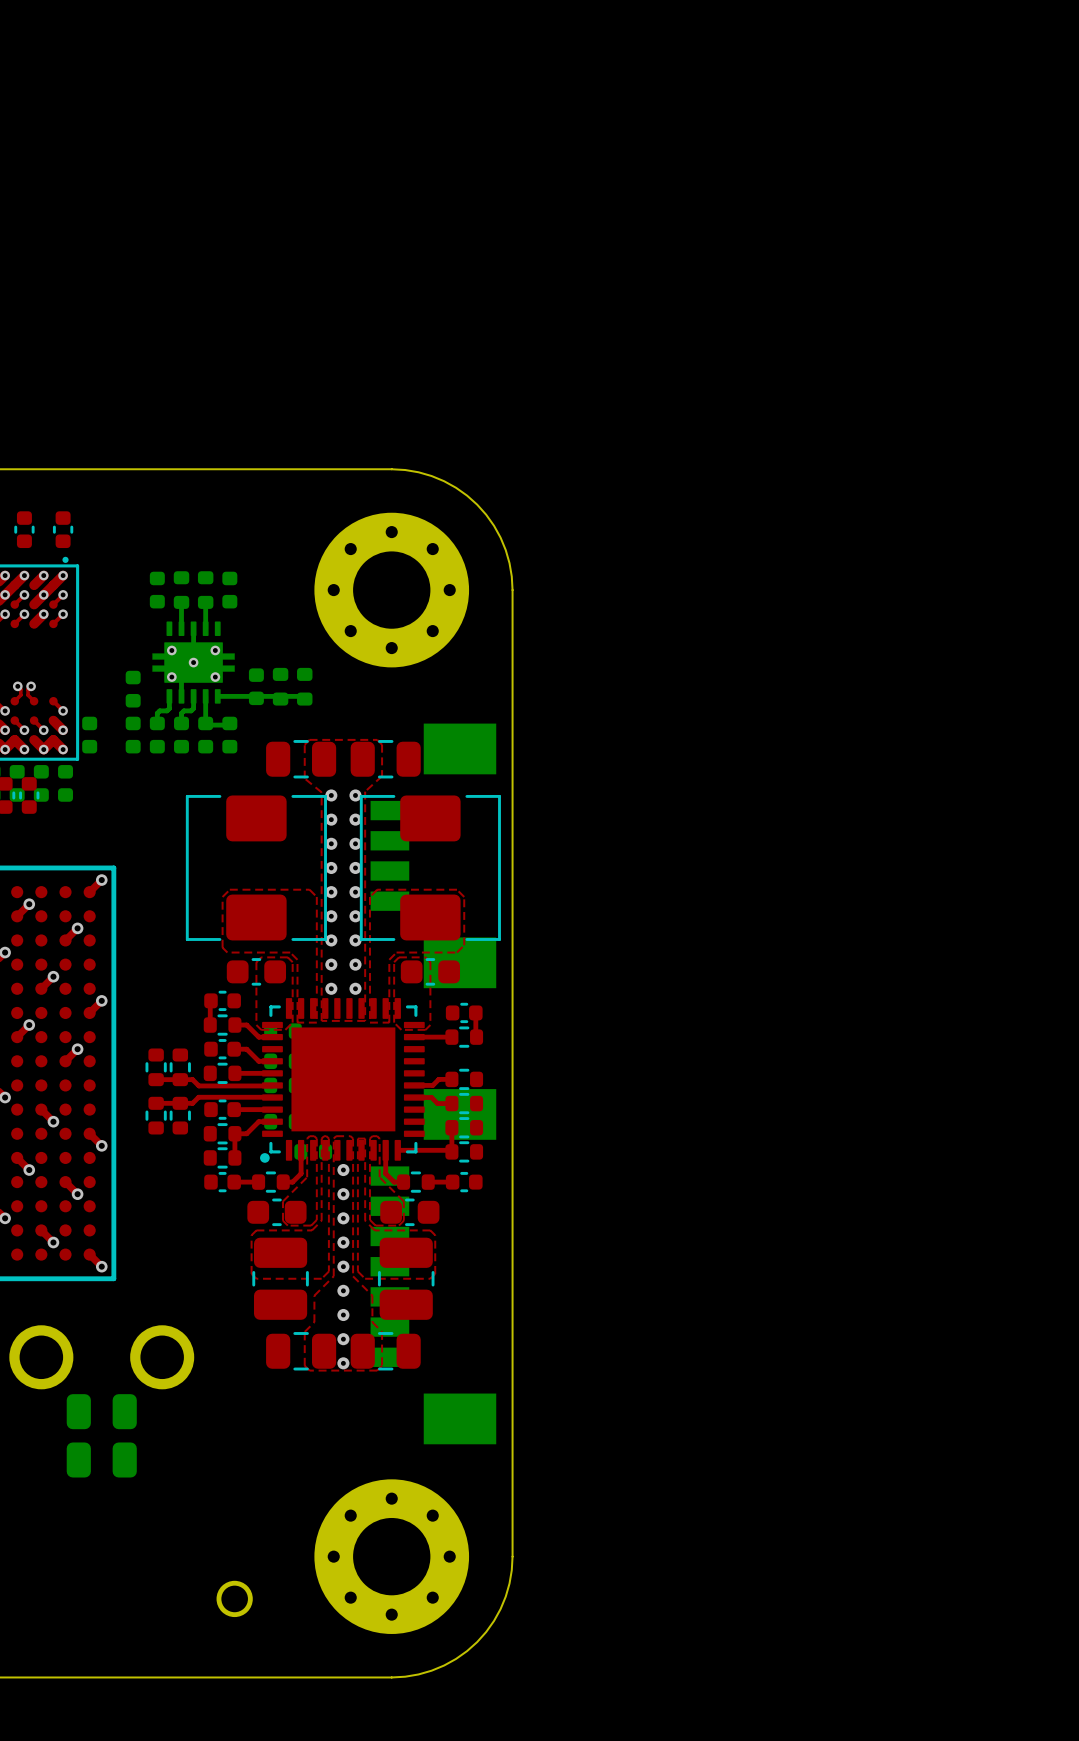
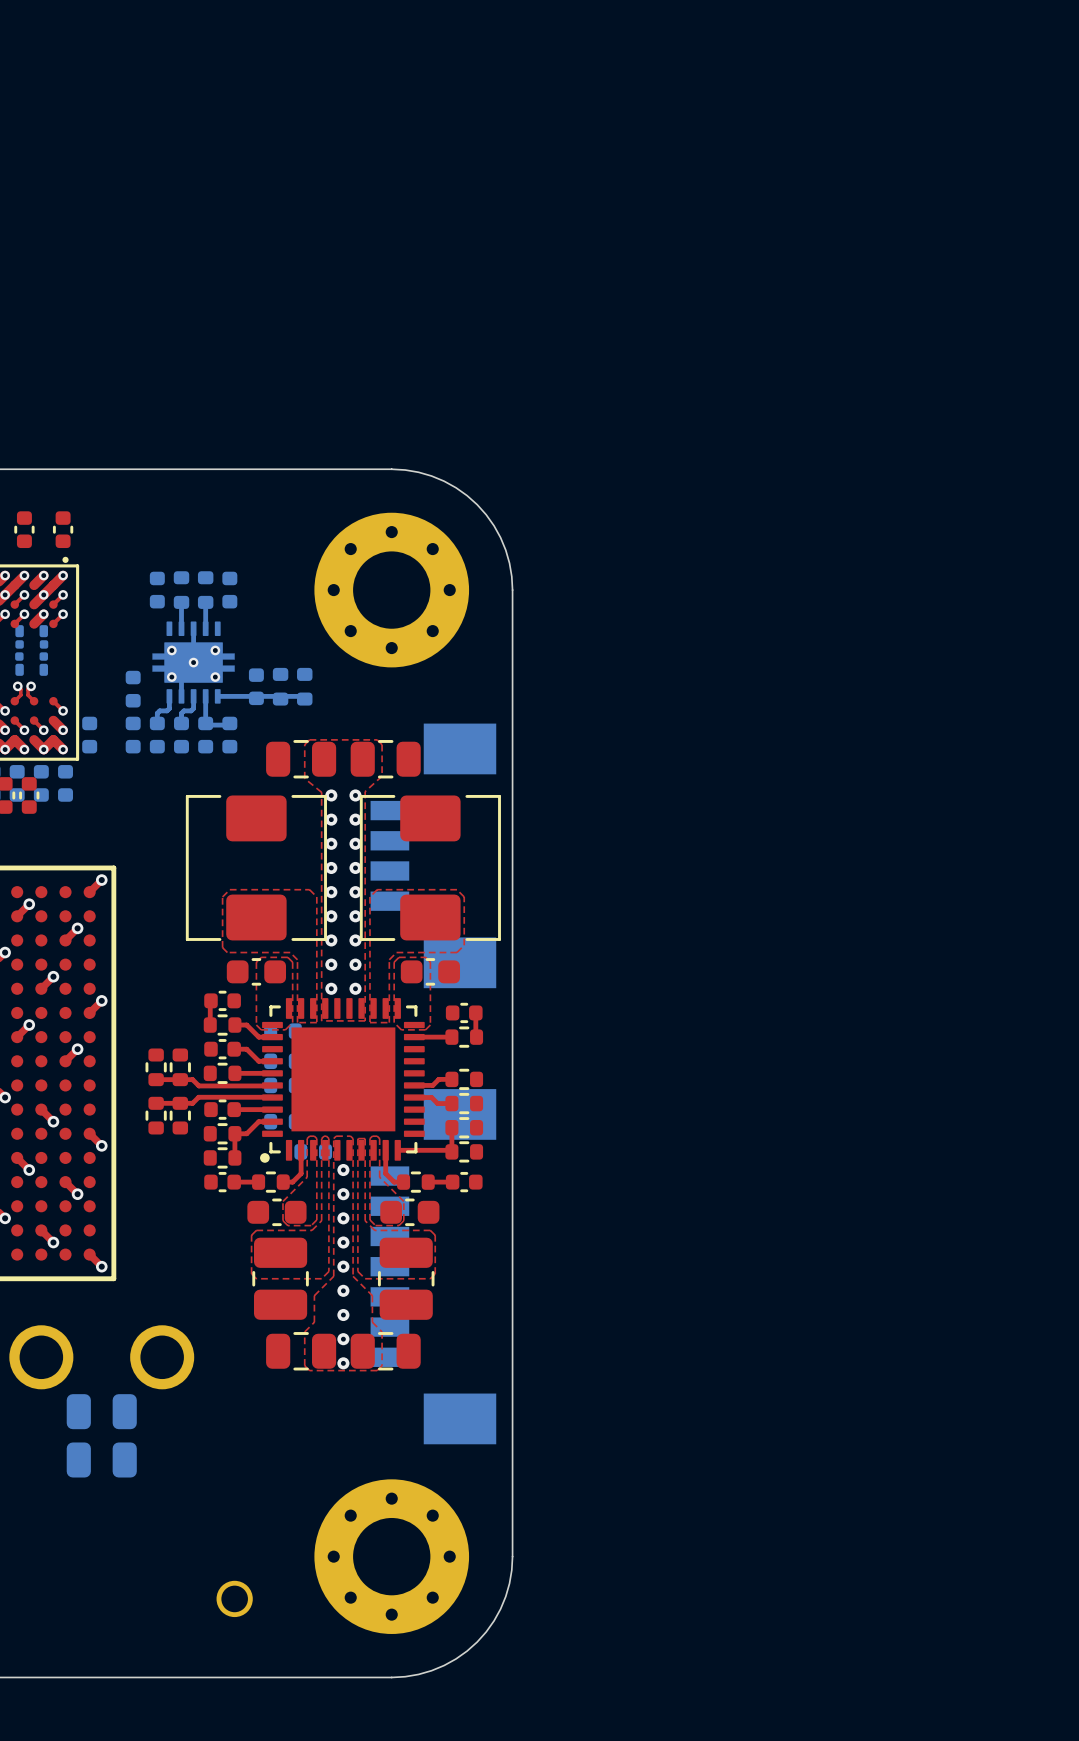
part: none -> (31, 650)

